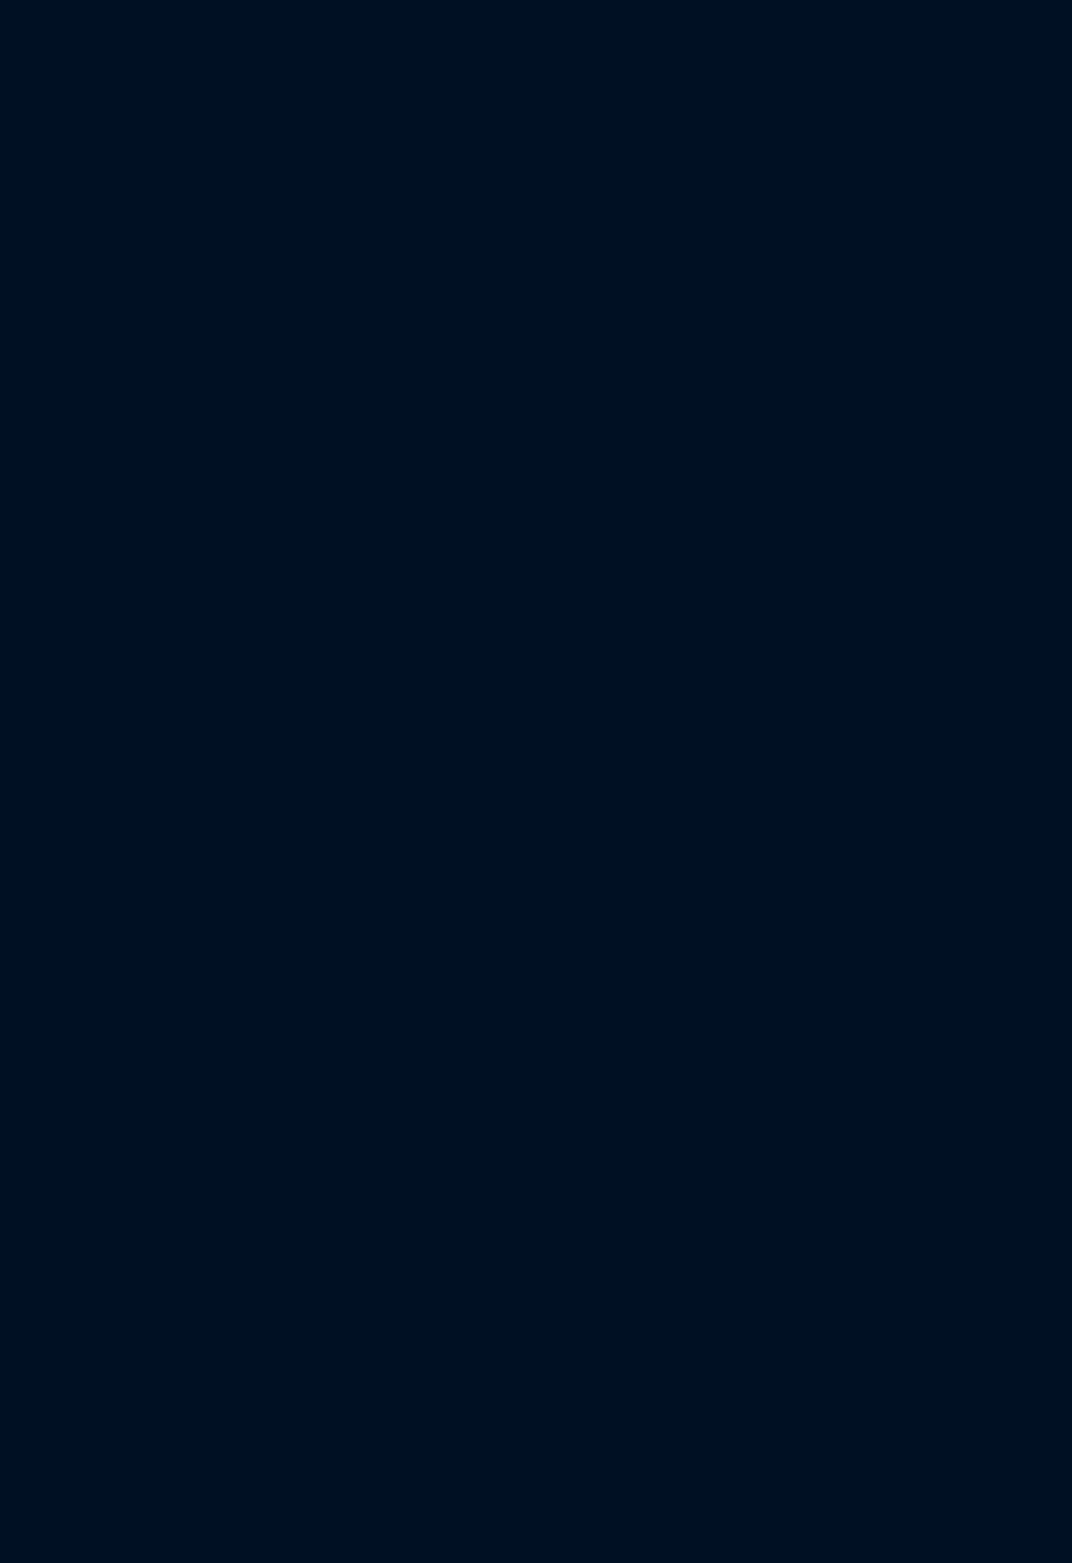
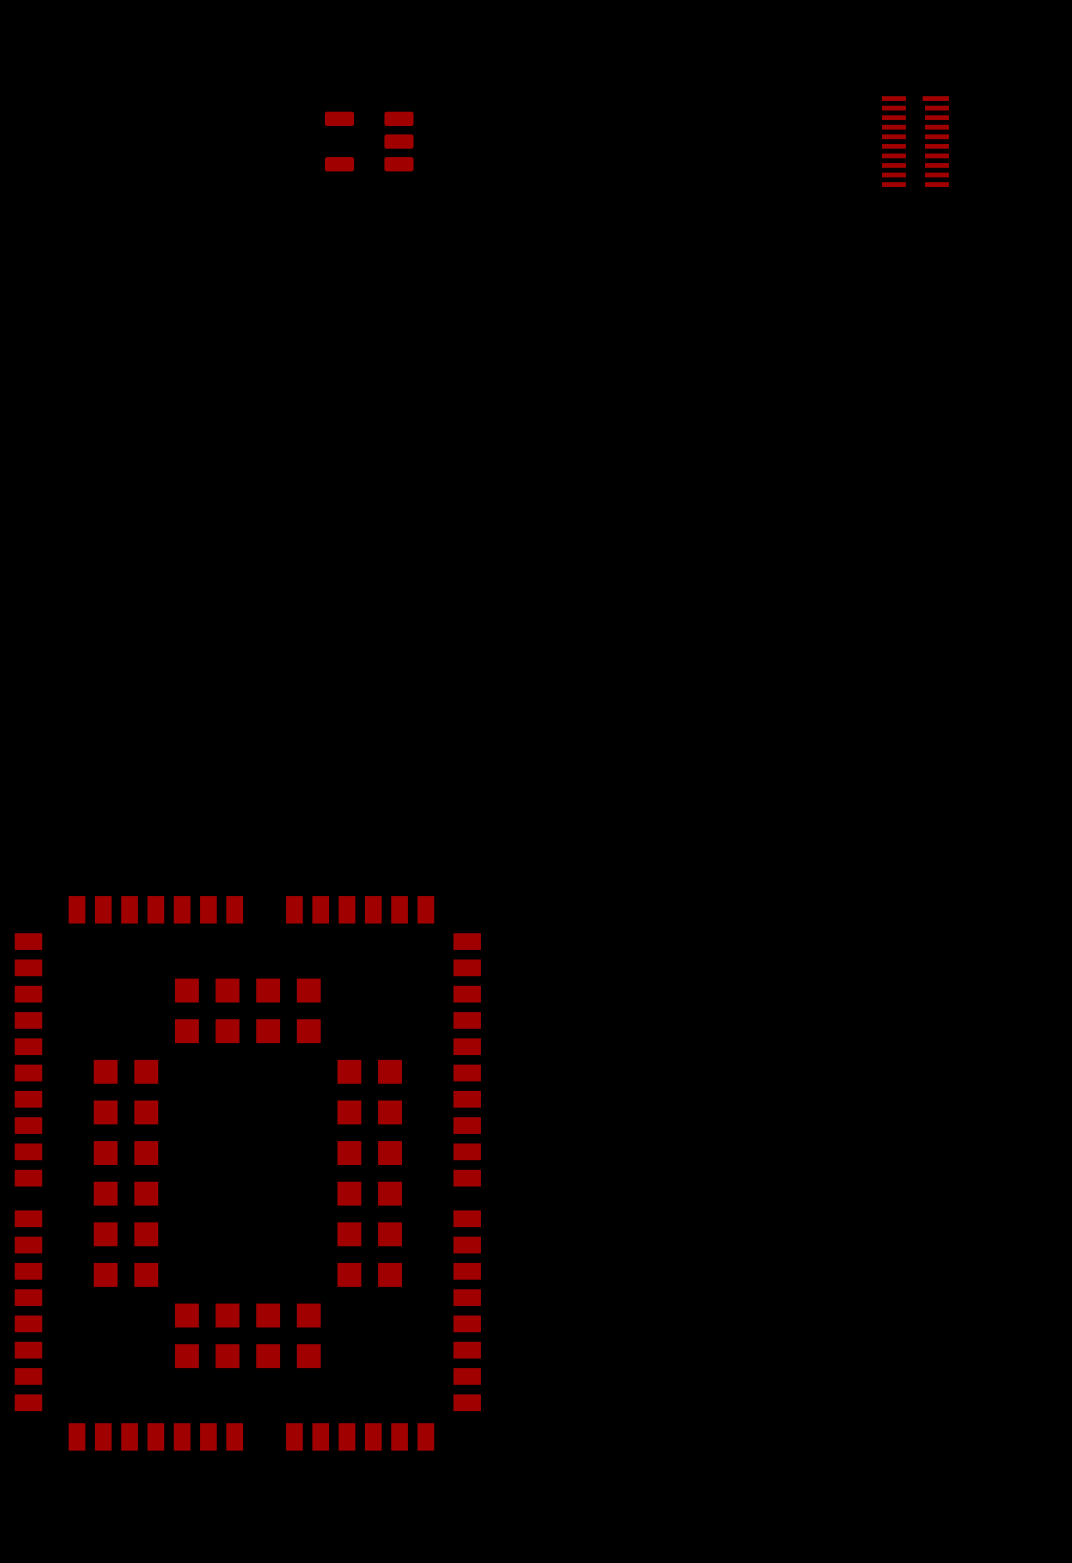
part: none -> (369, 141)
part: none -> (915, 141)
part: none -> (247, 1173)

